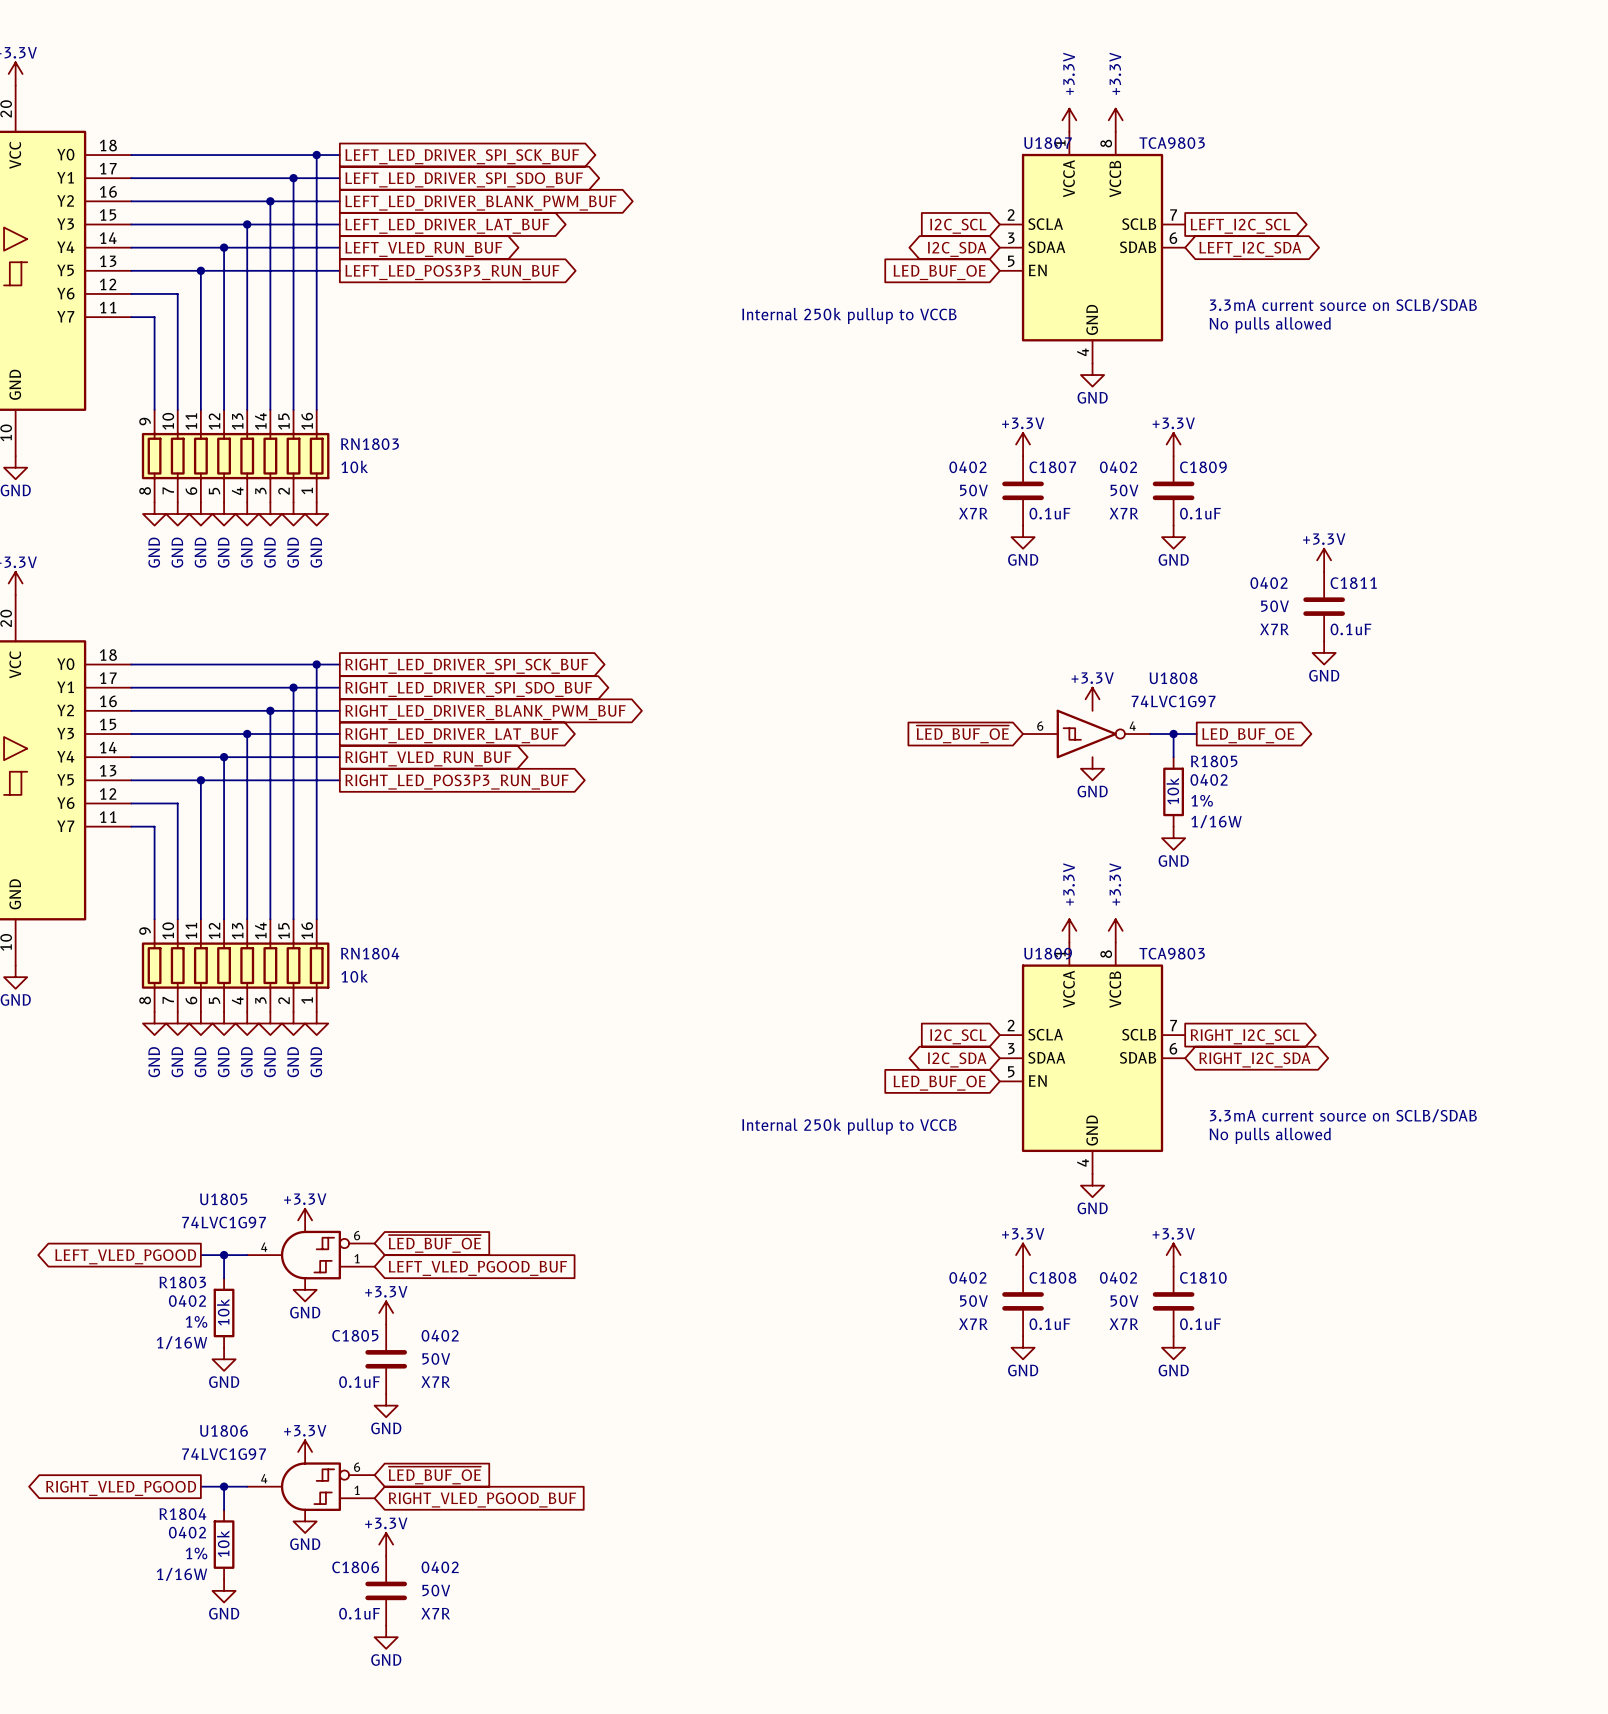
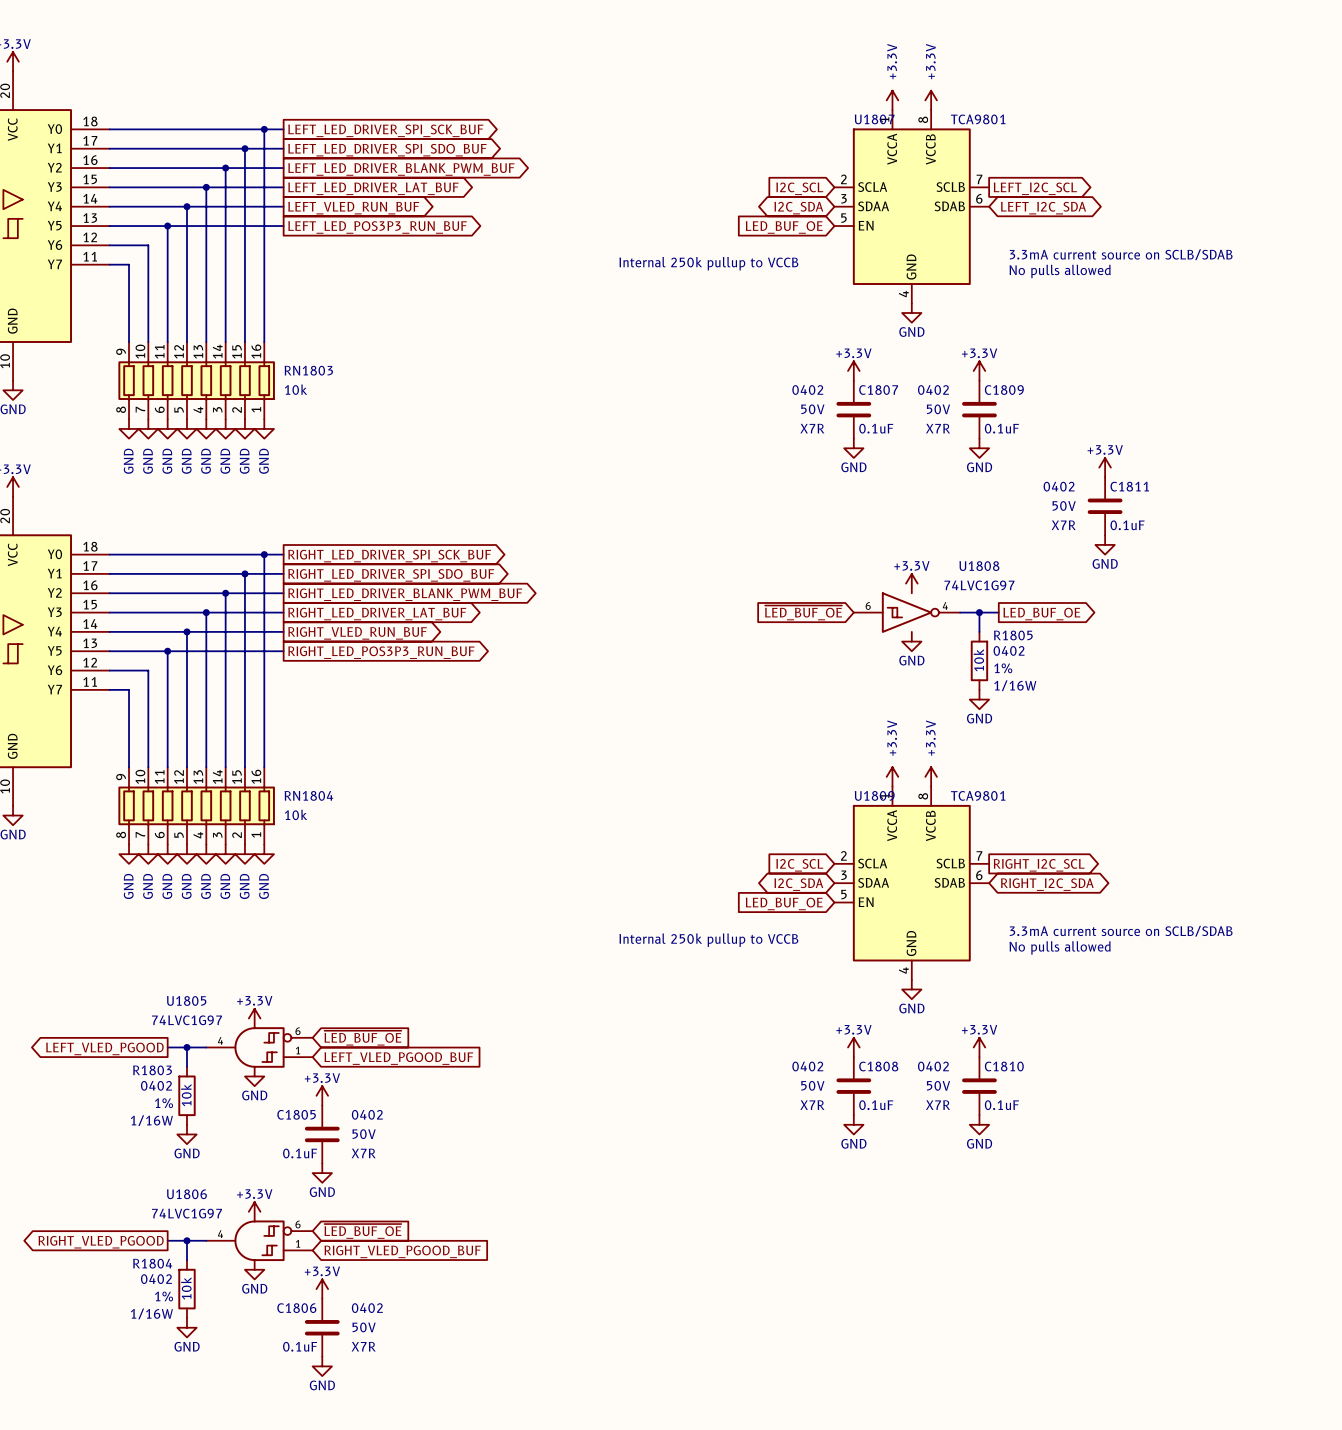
U1807 value: TCA9803 (1172, 143) -> TCA9801 (978, 119)
U1809 value: TCA9803 (1172, 953) -> TCA9801 (978, 795)

